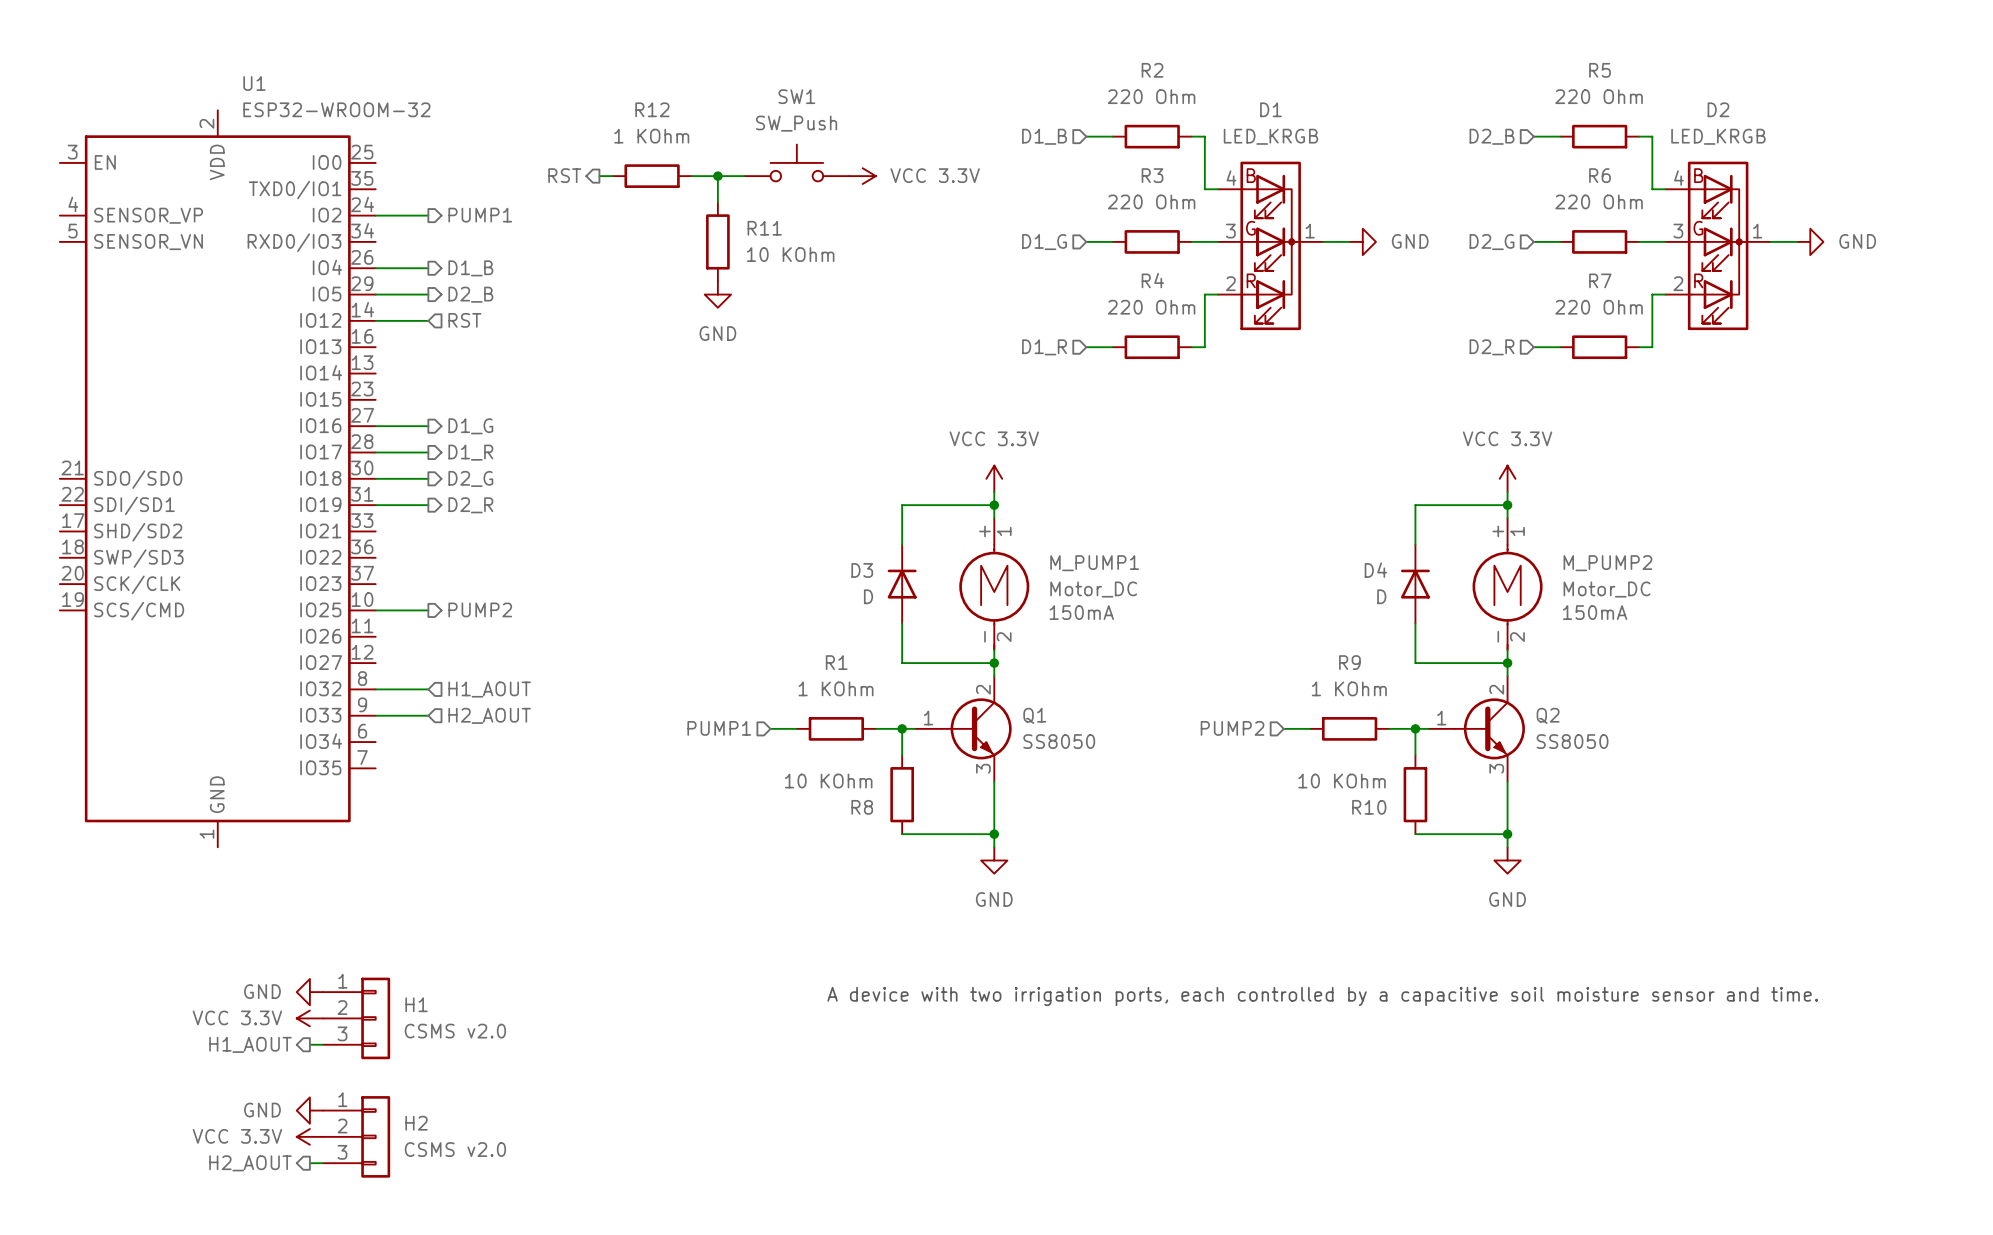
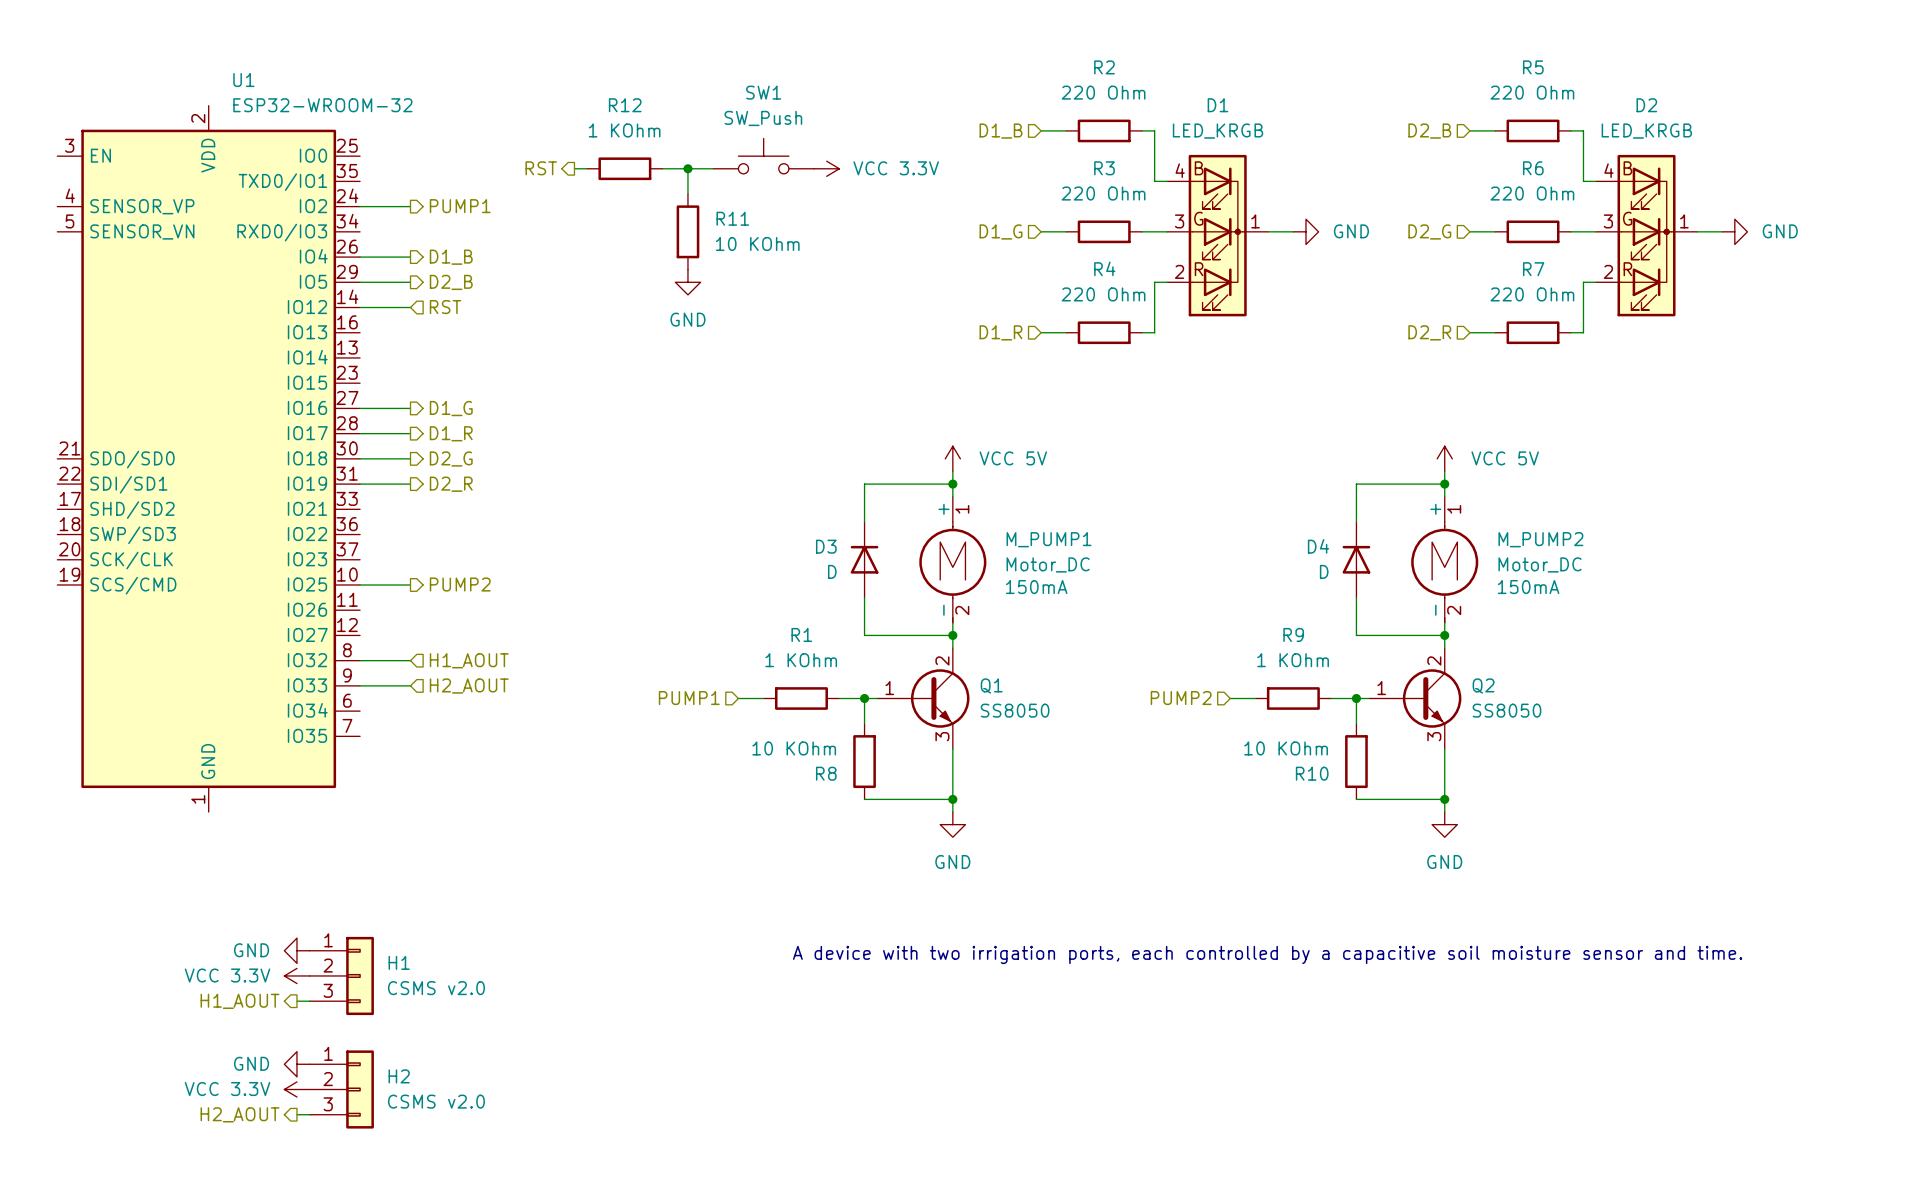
power symbol: VCC 3.3V (994, 478) -> VCC 5V (952, 458)
power symbol: VCC 3.3V (1507, 478) -> VCC 5V (1444, 458)

